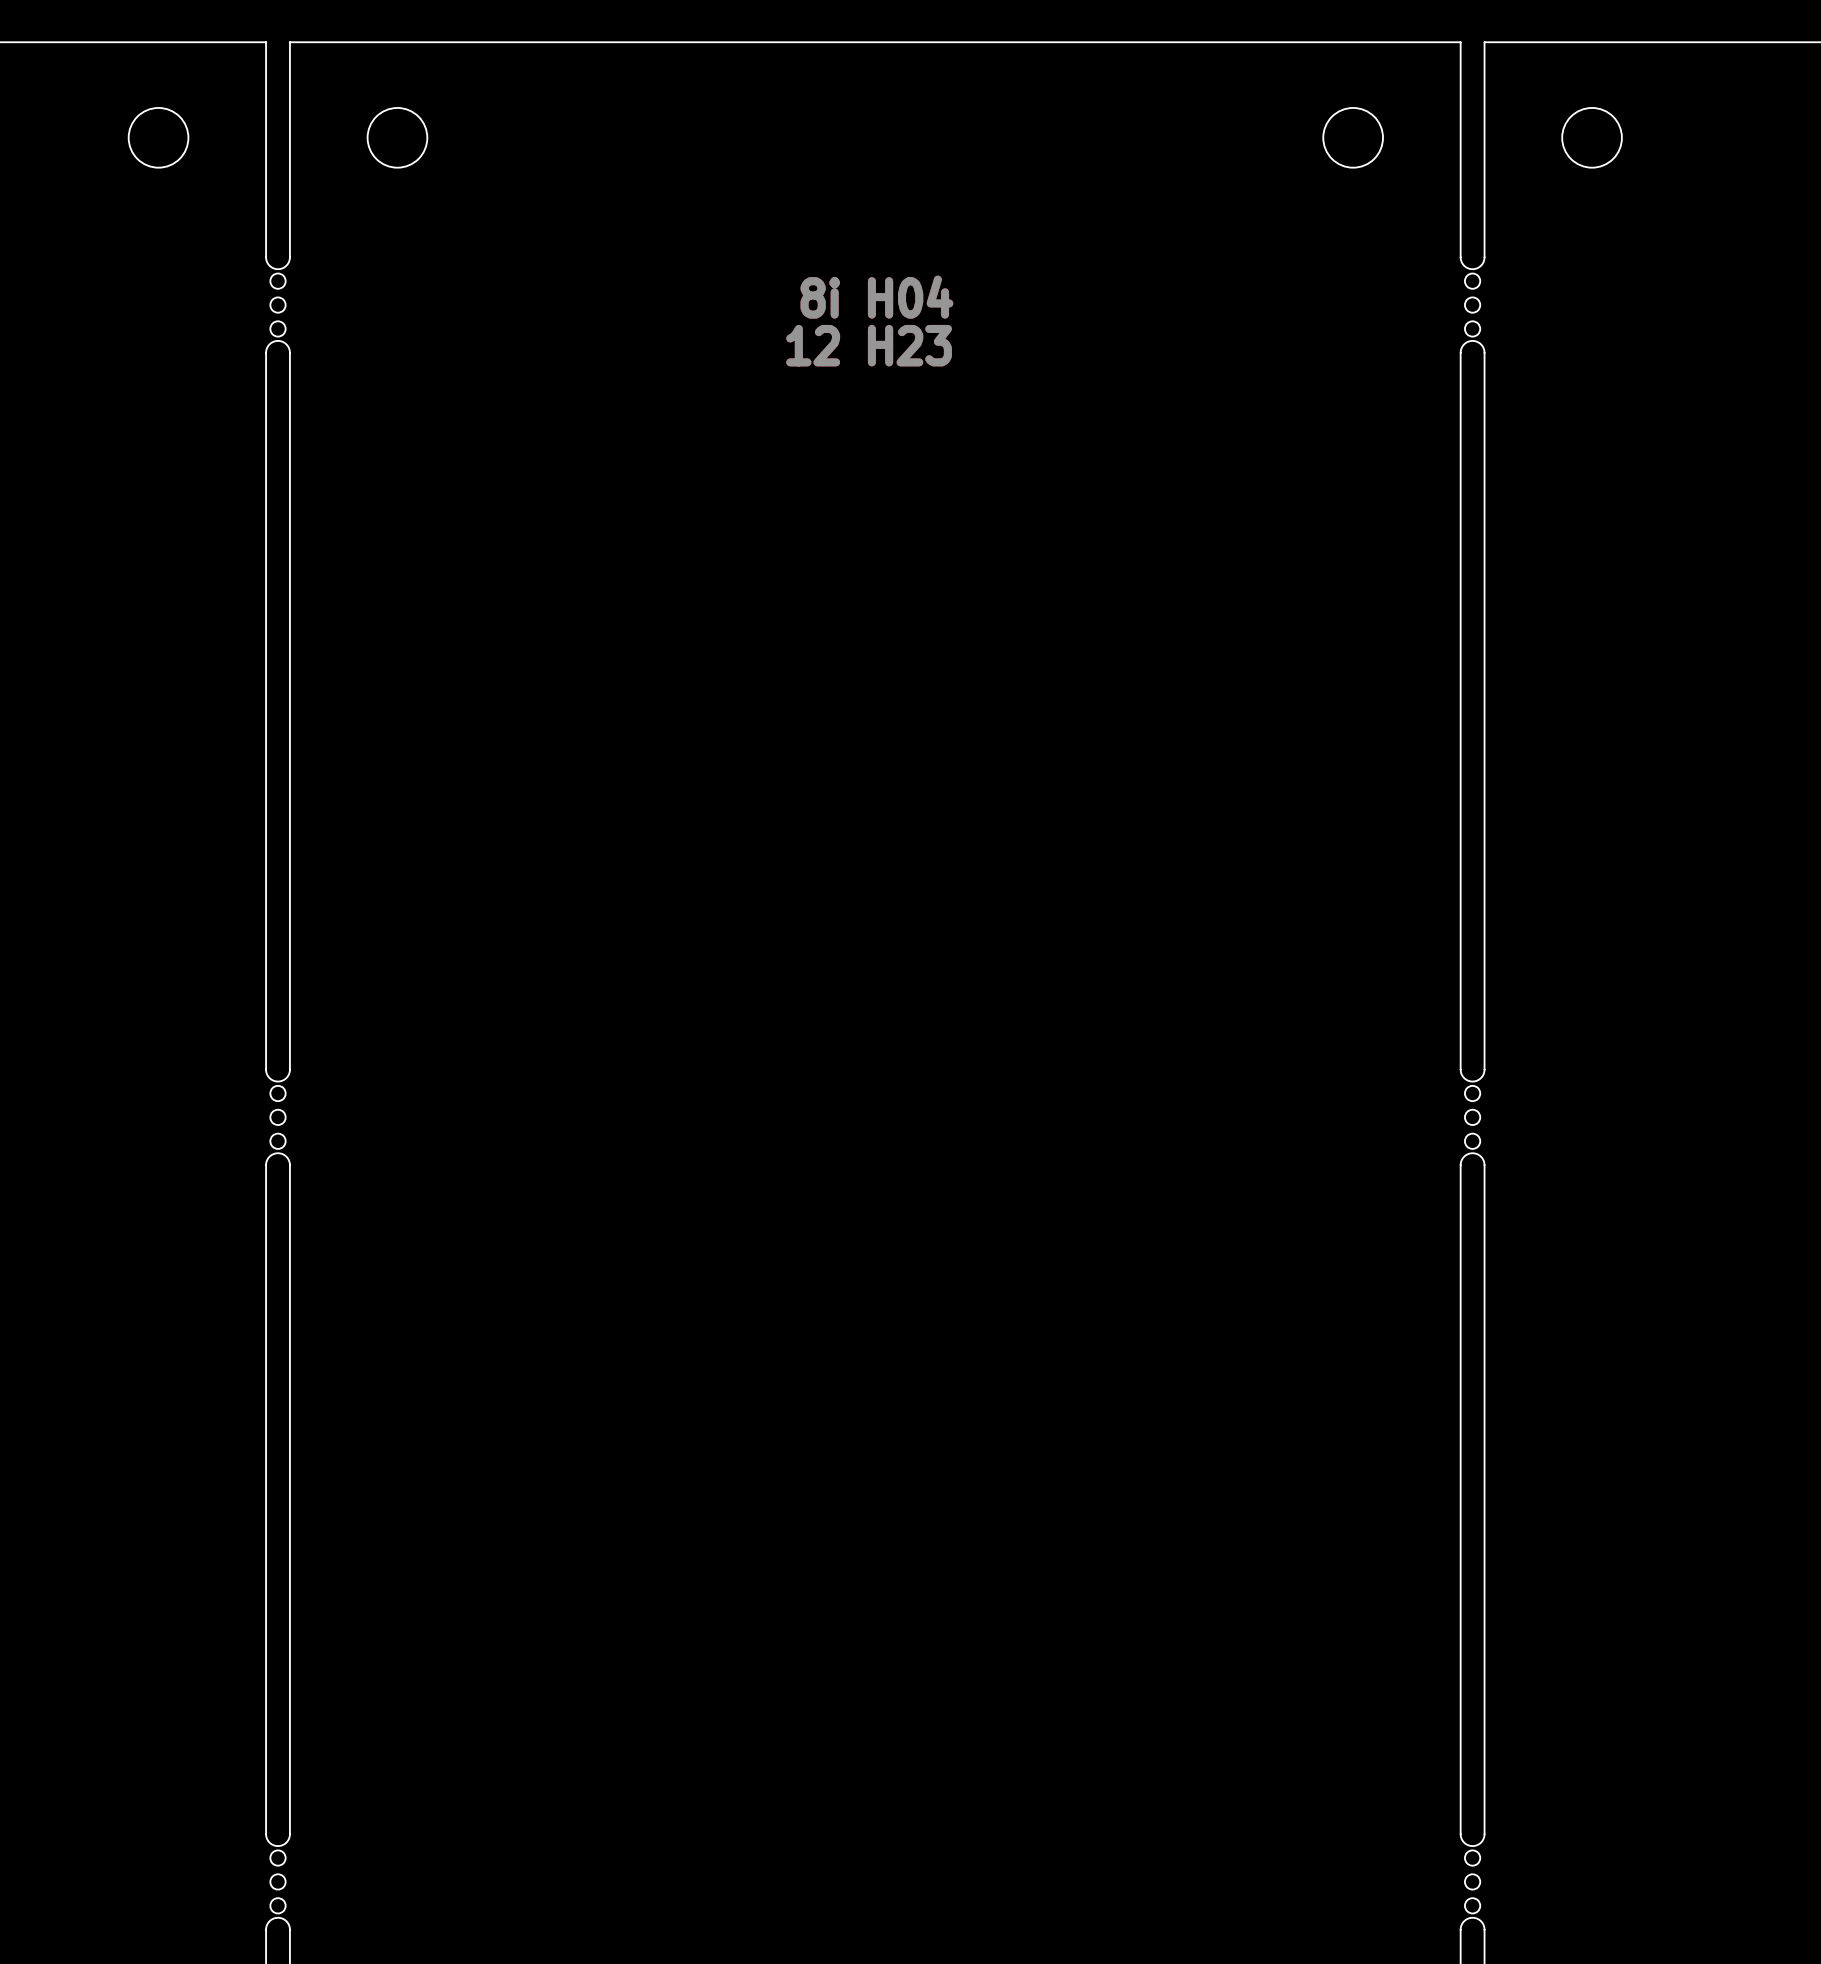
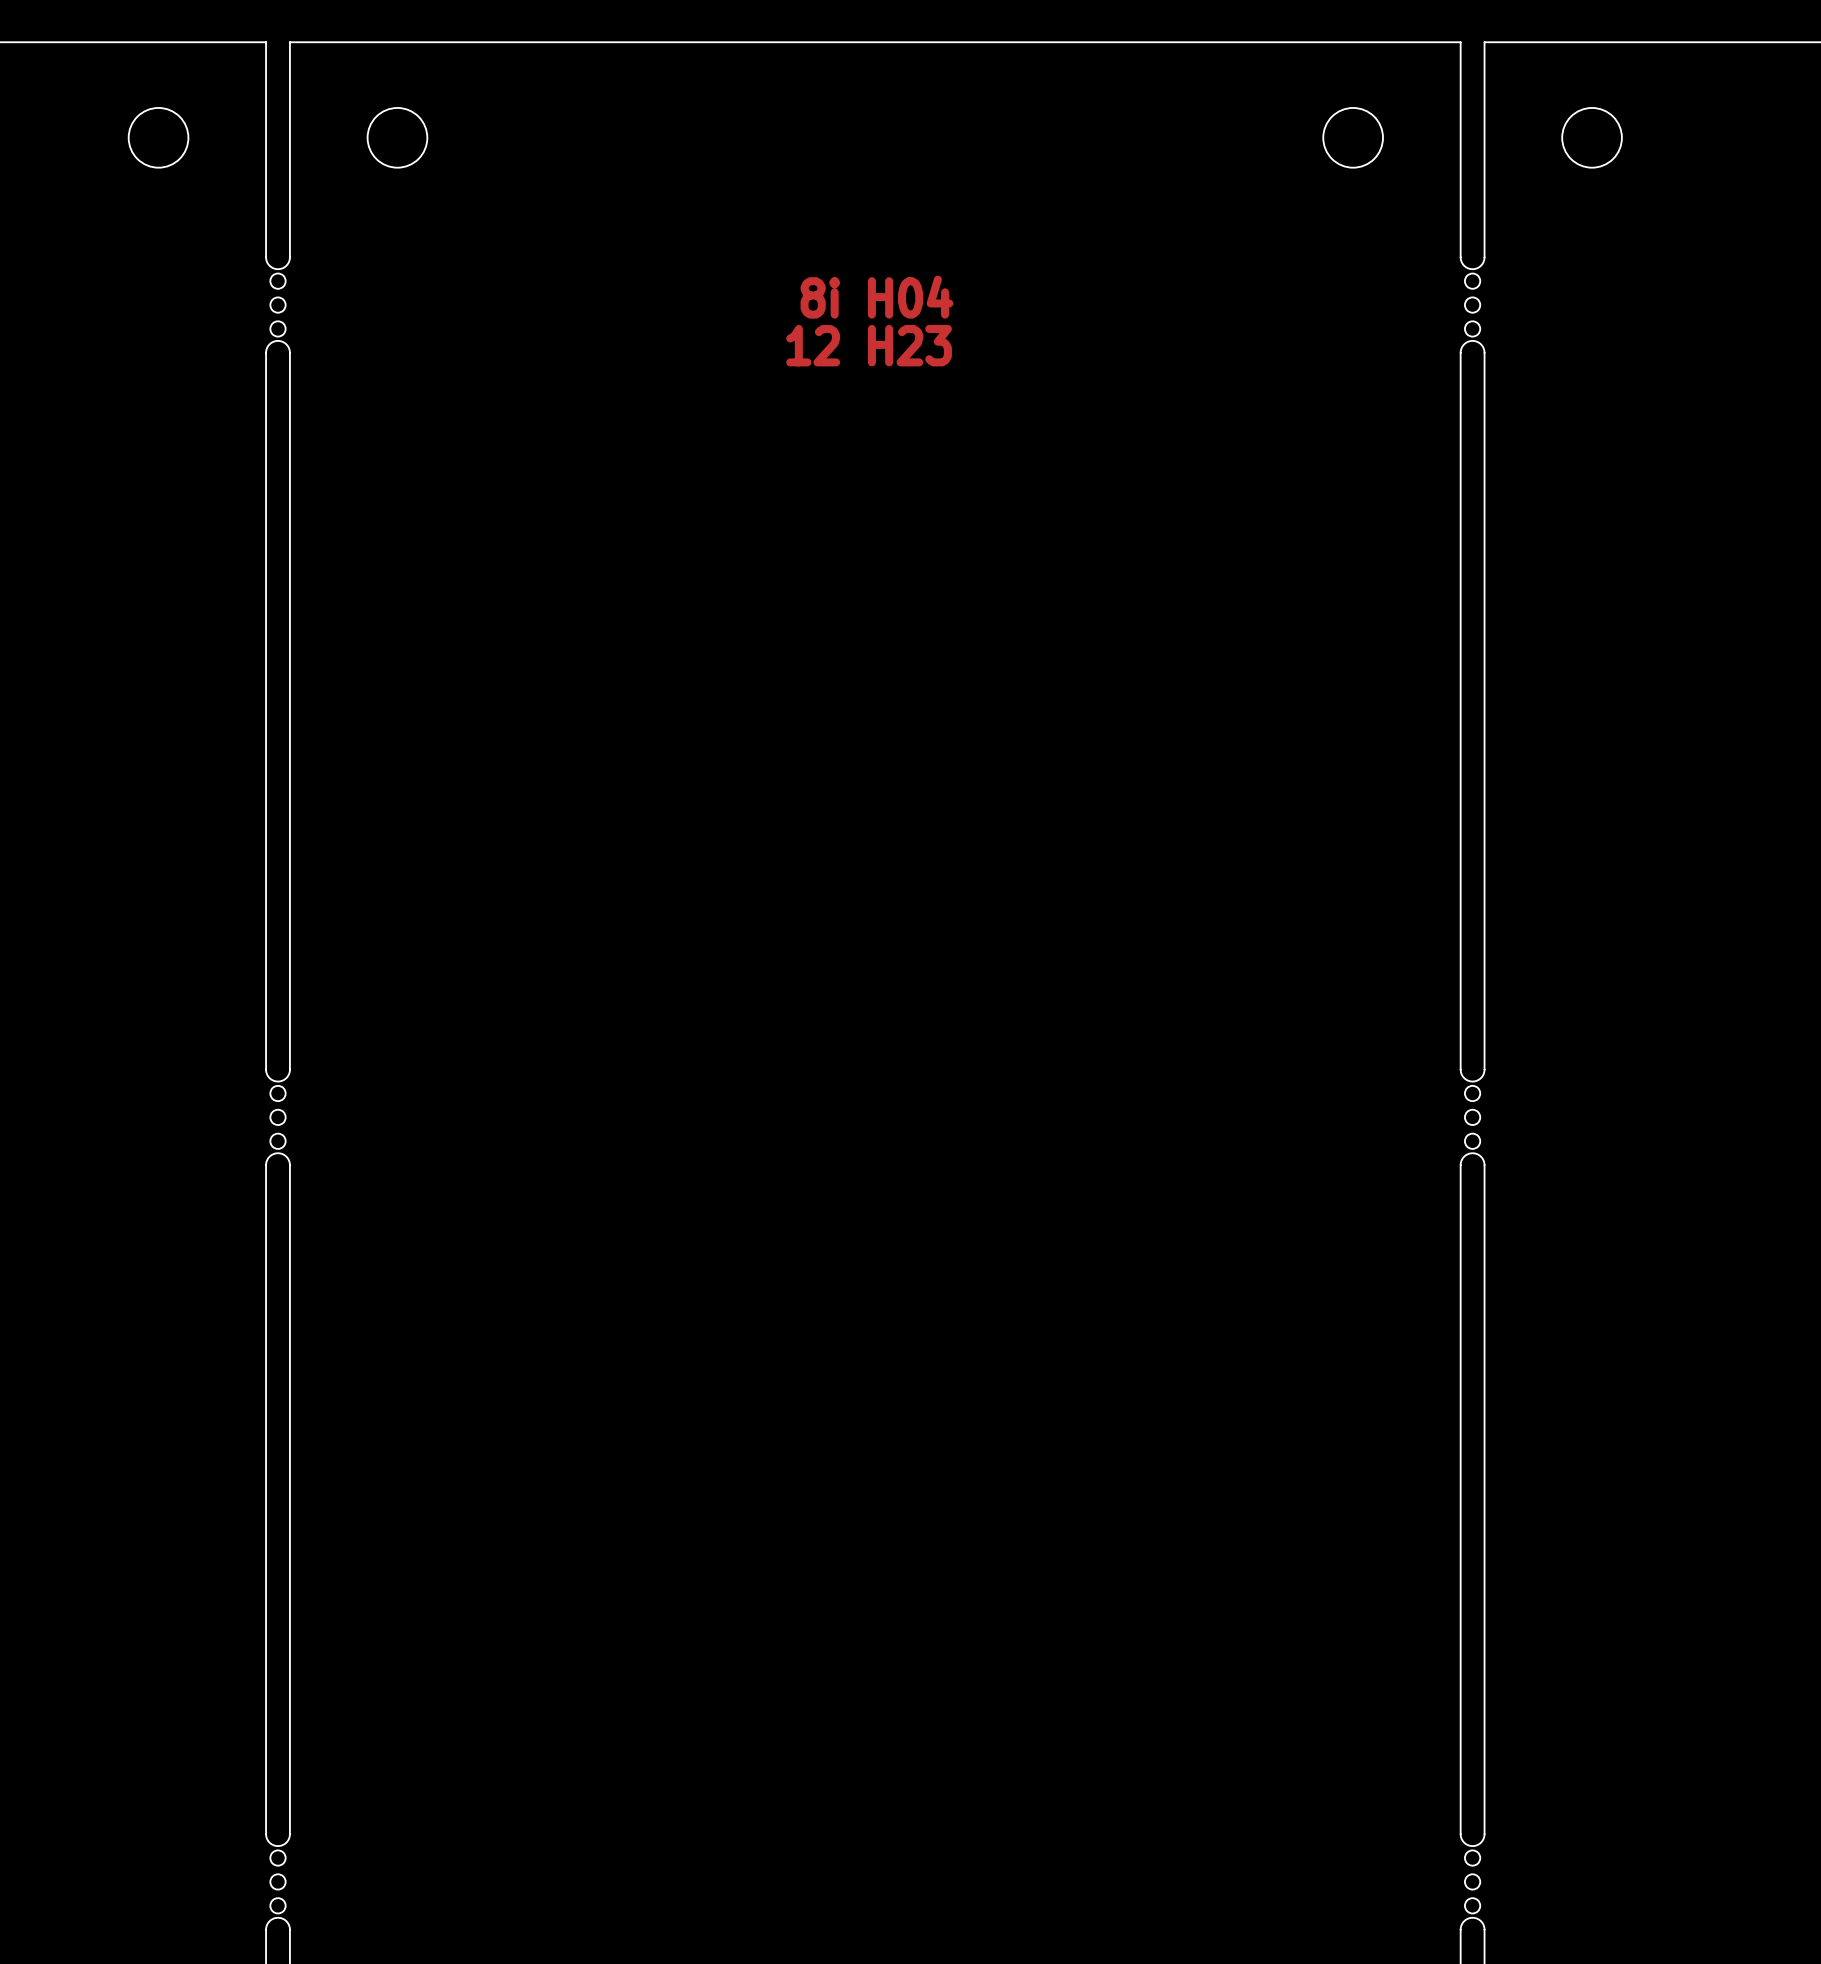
text: 8i H04 (876, 297) -> none
text: 12 H23 (869, 345) -> none

